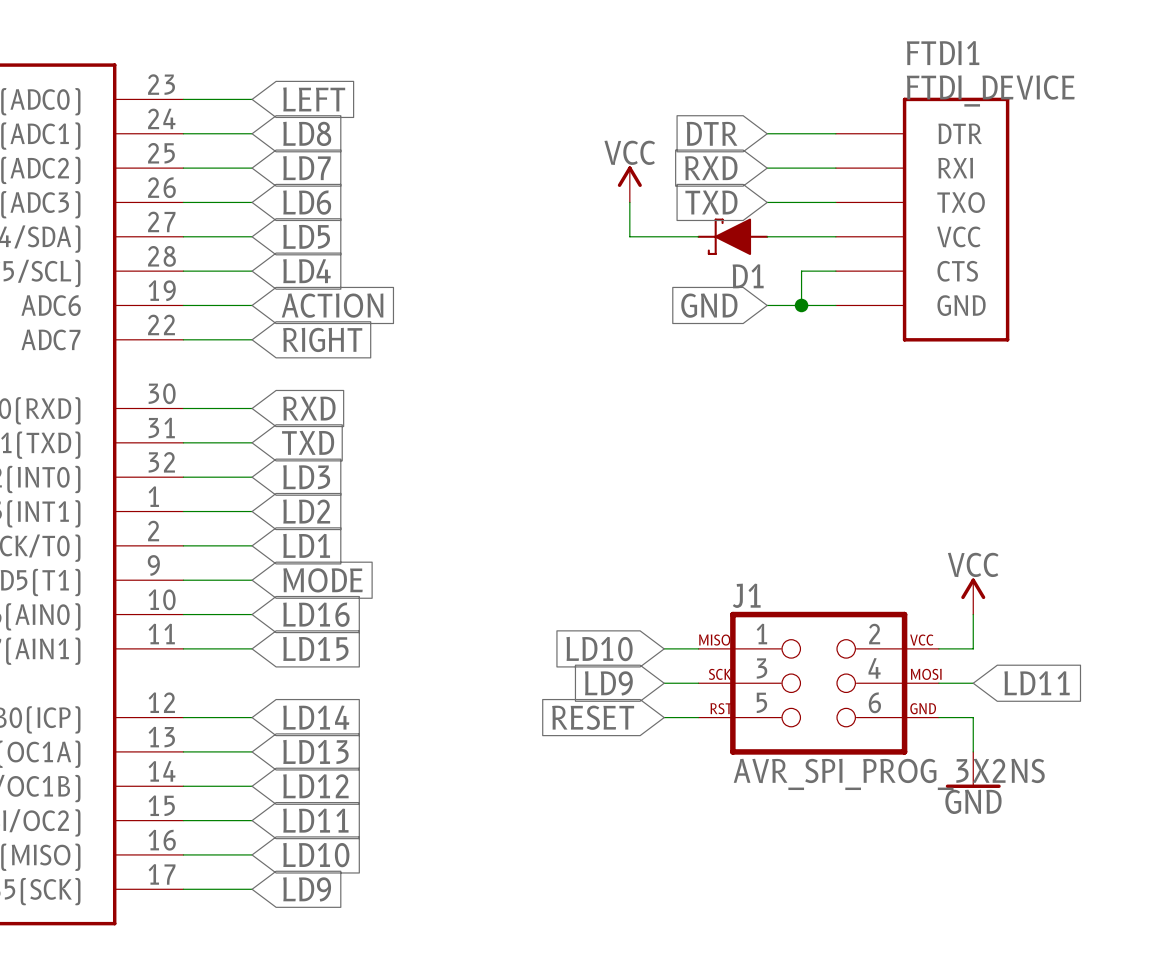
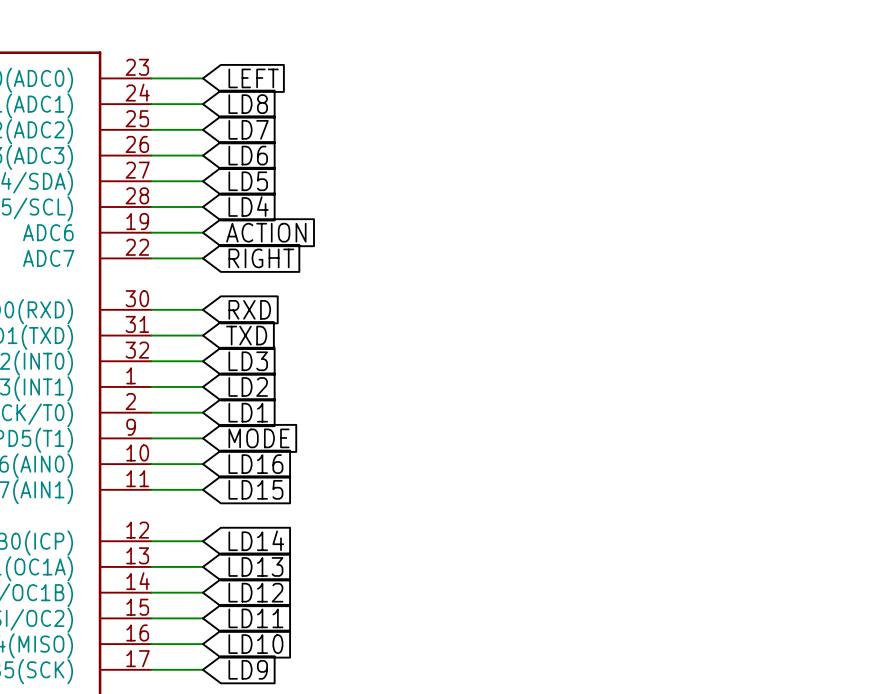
global label: DTR (712, 133) -> none
wire: (767, 133) (835, 133) -> none
global label: RXD (711, 168) -> none
wire: (767, 168) (835, 168) -> none
power symbol: VCC (629, 184) -> none
wire: (629, 202) (629, 236) (698, 236) -> none
global label: TXD (711, 202) -> none
wire: (767, 202) (835, 202) -> none
FTDI1: FTDI_DEVICE (922, 219) -> none
D1: (732, 236) -> none
wire: (767, 236) (835, 236) -> none
wire: (835, 271) (801, 271) (801, 305) -> none
global label: GND (709, 305) -> none
wire: (767, 305) (835, 305) -> none
junction: (801, 305) -> none
power symbol: VCC (973, 596) -> none
wire: (973, 614) (973, 648) (938, 648) -> none
wire: (664, 648) (698, 648) -> none
global label: LD10 (599, 649) -> none
global label: LD9 (608, 683) -> none
wire: (664, 683) (698, 683) -> none
J1: AVR_SPI_PROG_3X2NS (818, 683) -> none
wire: (938, 683) (973, 683) -> none
global label: LD11 (1037, 683) -> none
global label: RESET (593, 717) -> none
wire: (664, 717) (698, 717) -> none
wire: (938, 717) (973, 717) (973, 751) -> none
power symbol: GND (973, 769) -> none

